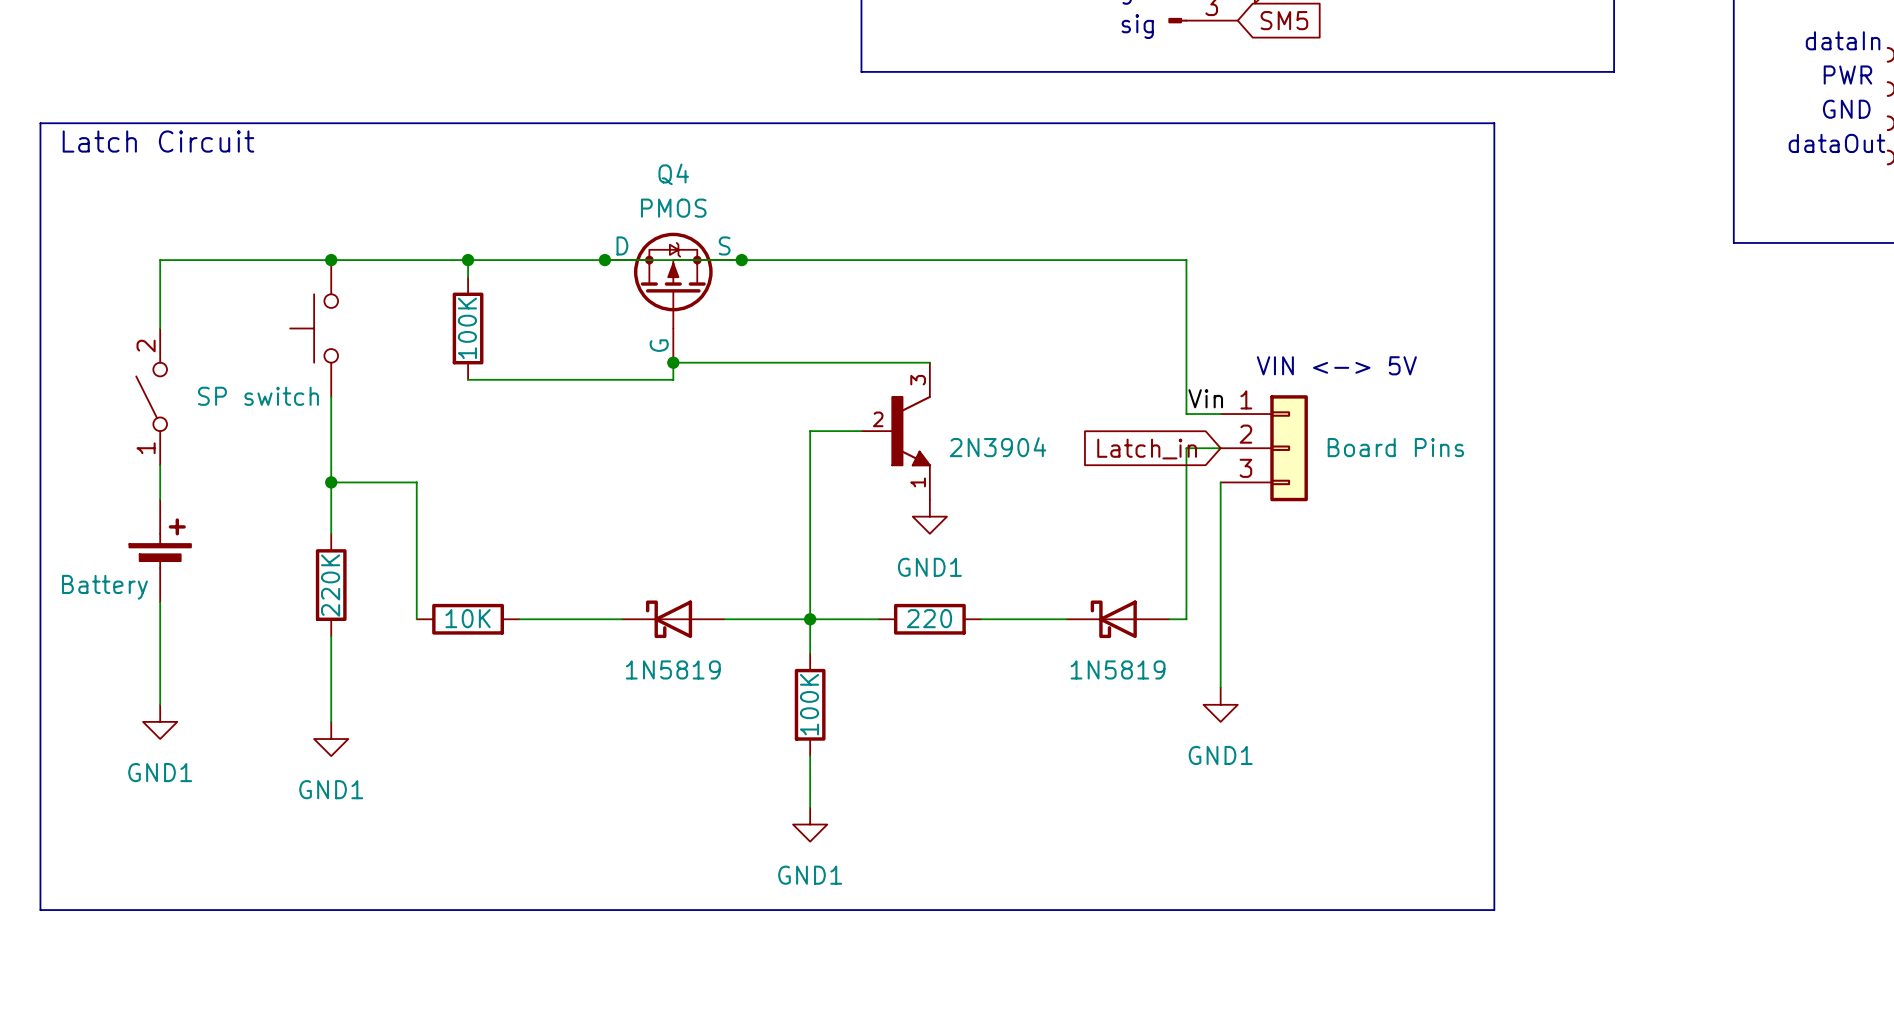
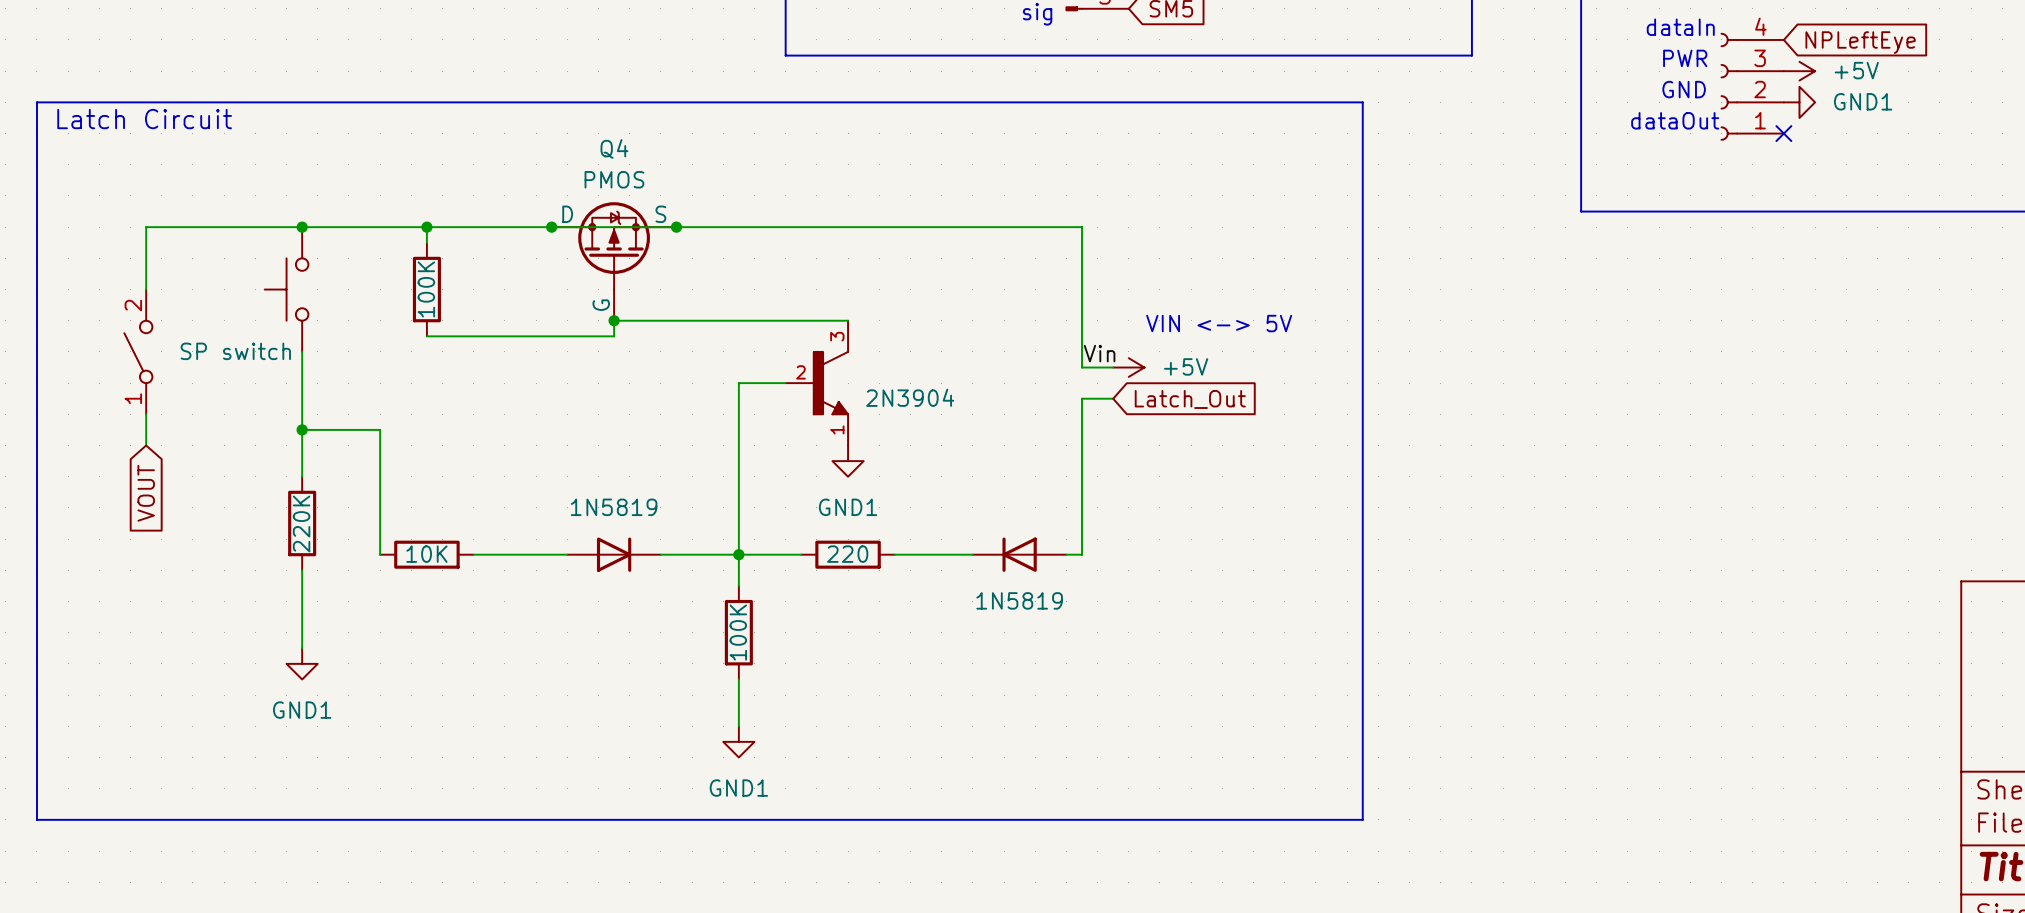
power symbol: none -> +5V (1128, 367)
part: Board Pins (1264, 448) -> none
global label: Latch_in (1147, 449) -> Latch_Out (1190, 399)
wire: (1220, 482) (1220, 687) -> none
part: Battery (160, 550) -> none
global label: none -> VOUT (146, 493)
part symbol: [622, 600, 725, 639] -> [567, 537, 661, 572]
part symbol: [1066, 600, 1170, 639] -> [972, 537, 1067, 572]
wire: (160, 602) (160, 704) -> none
part value position: 1N5819 (673, 669) -> 1N5819 (614, 507)
power symbol: GND1 (1220, 704) -> none
power symbol: GND1 (160, 721) -> none

